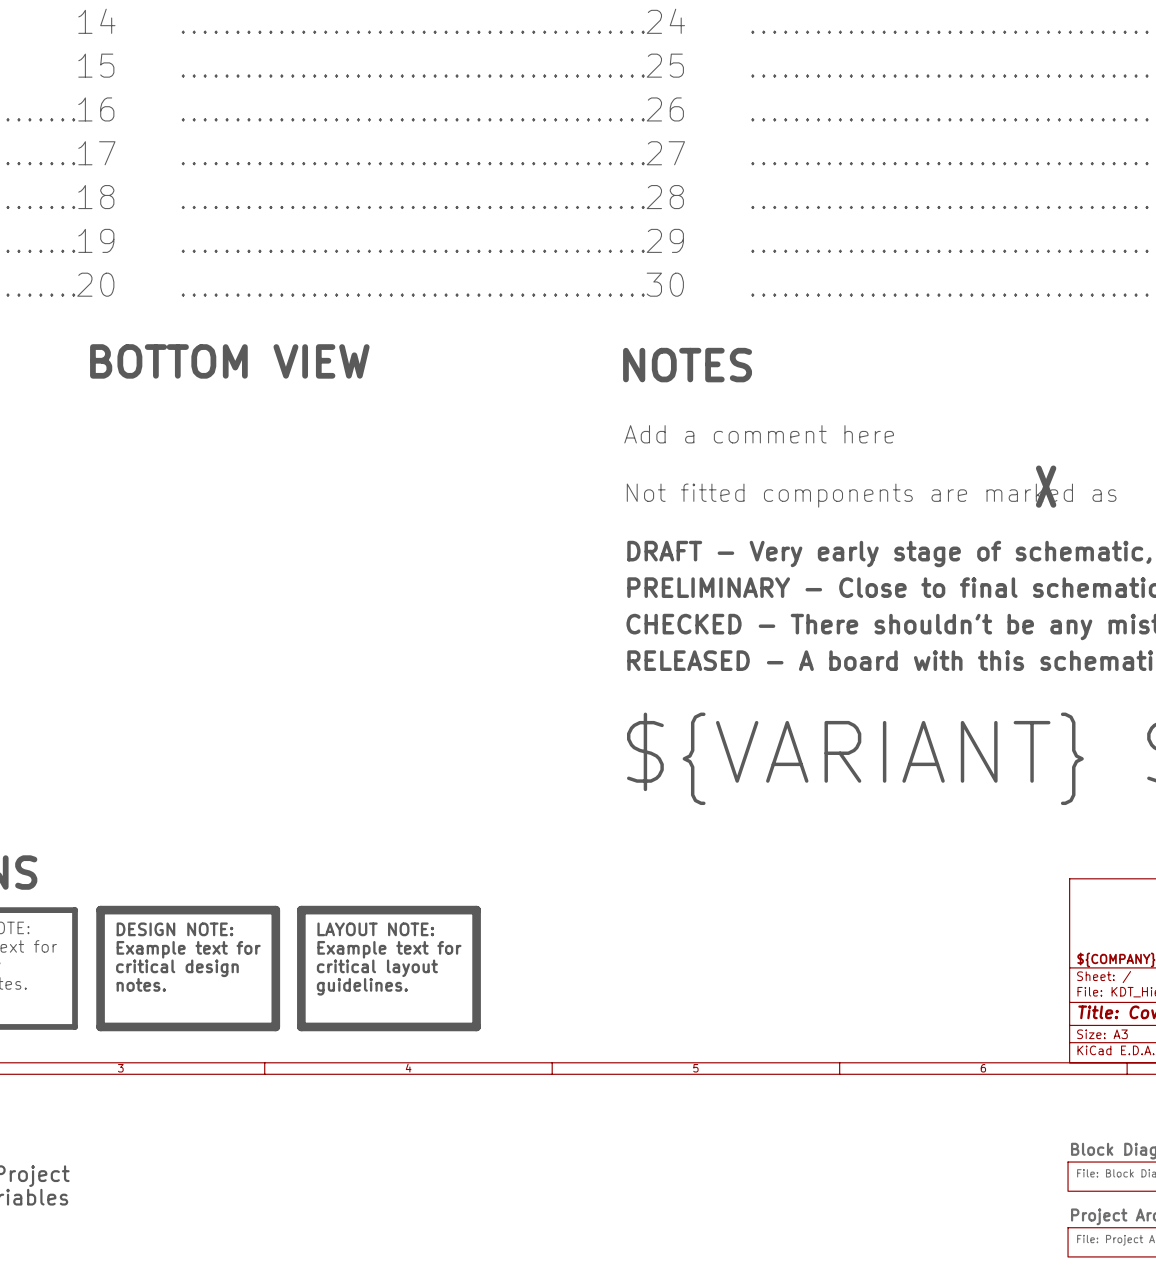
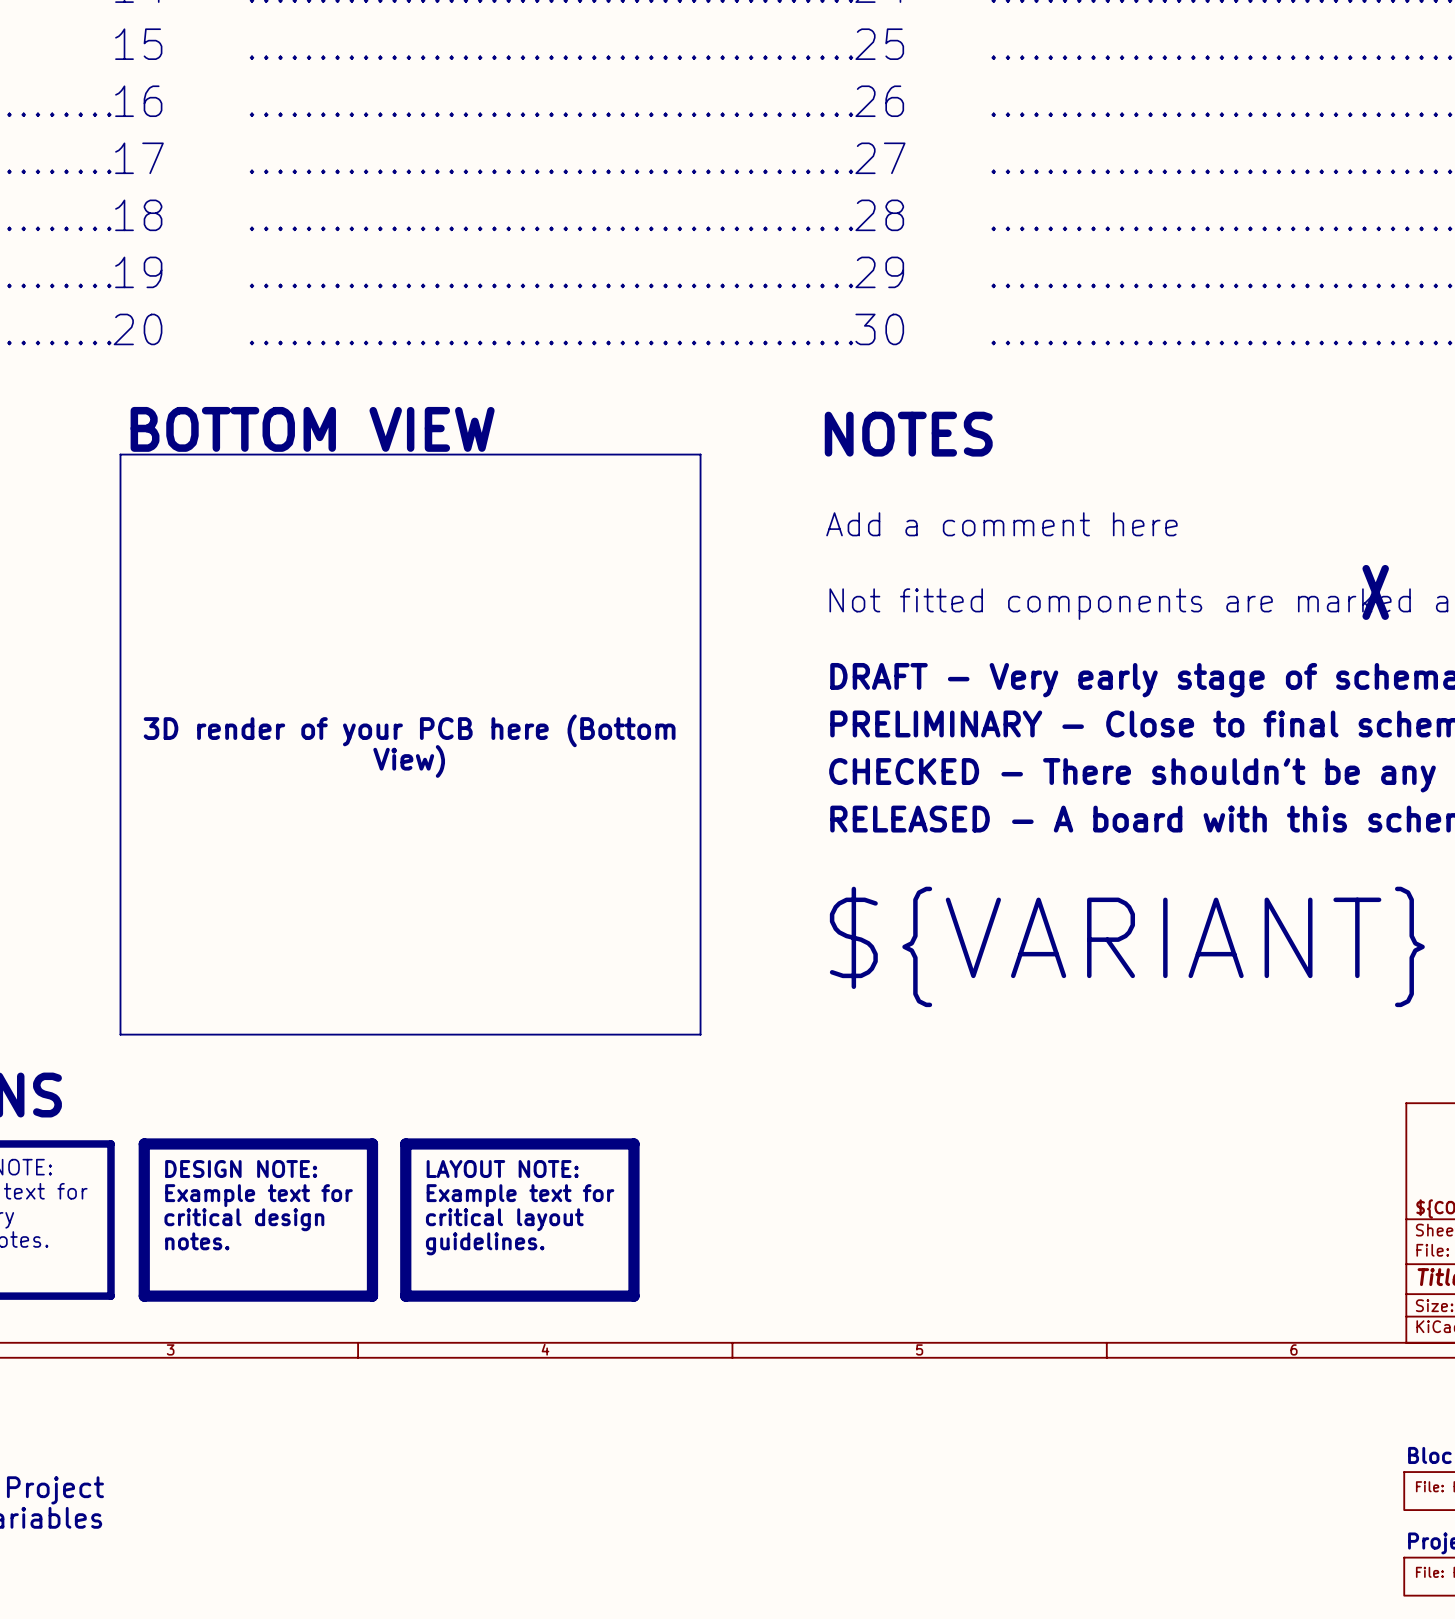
line: none -> (120, 454) (700, 454) (700, 1034) (120, 1034) (120, 454)
text: none -> 3D render of your PCB here (Bottom (409, 730)
text: none -> View) (409, 761)

